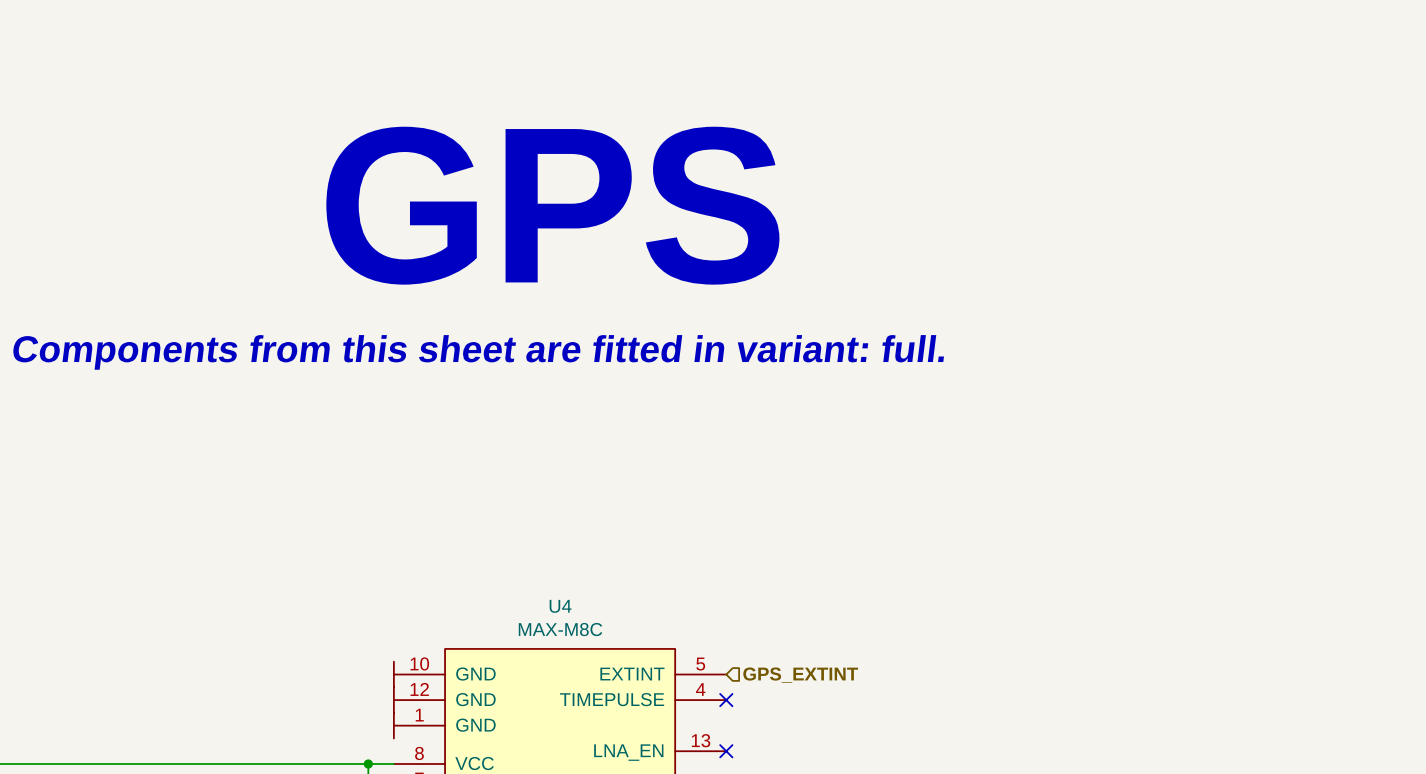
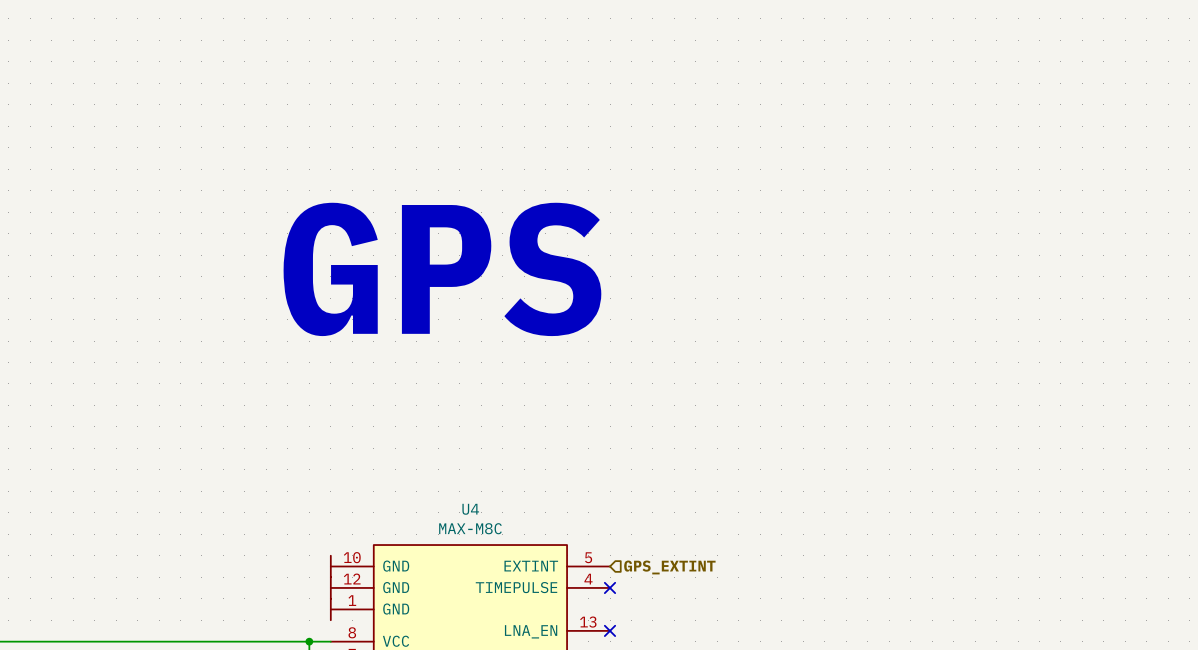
text position: GPS (552, 205) -> GPS (442, 269)
text: Components from this sheet are fitted in variant: full. (478, 352) -> none

